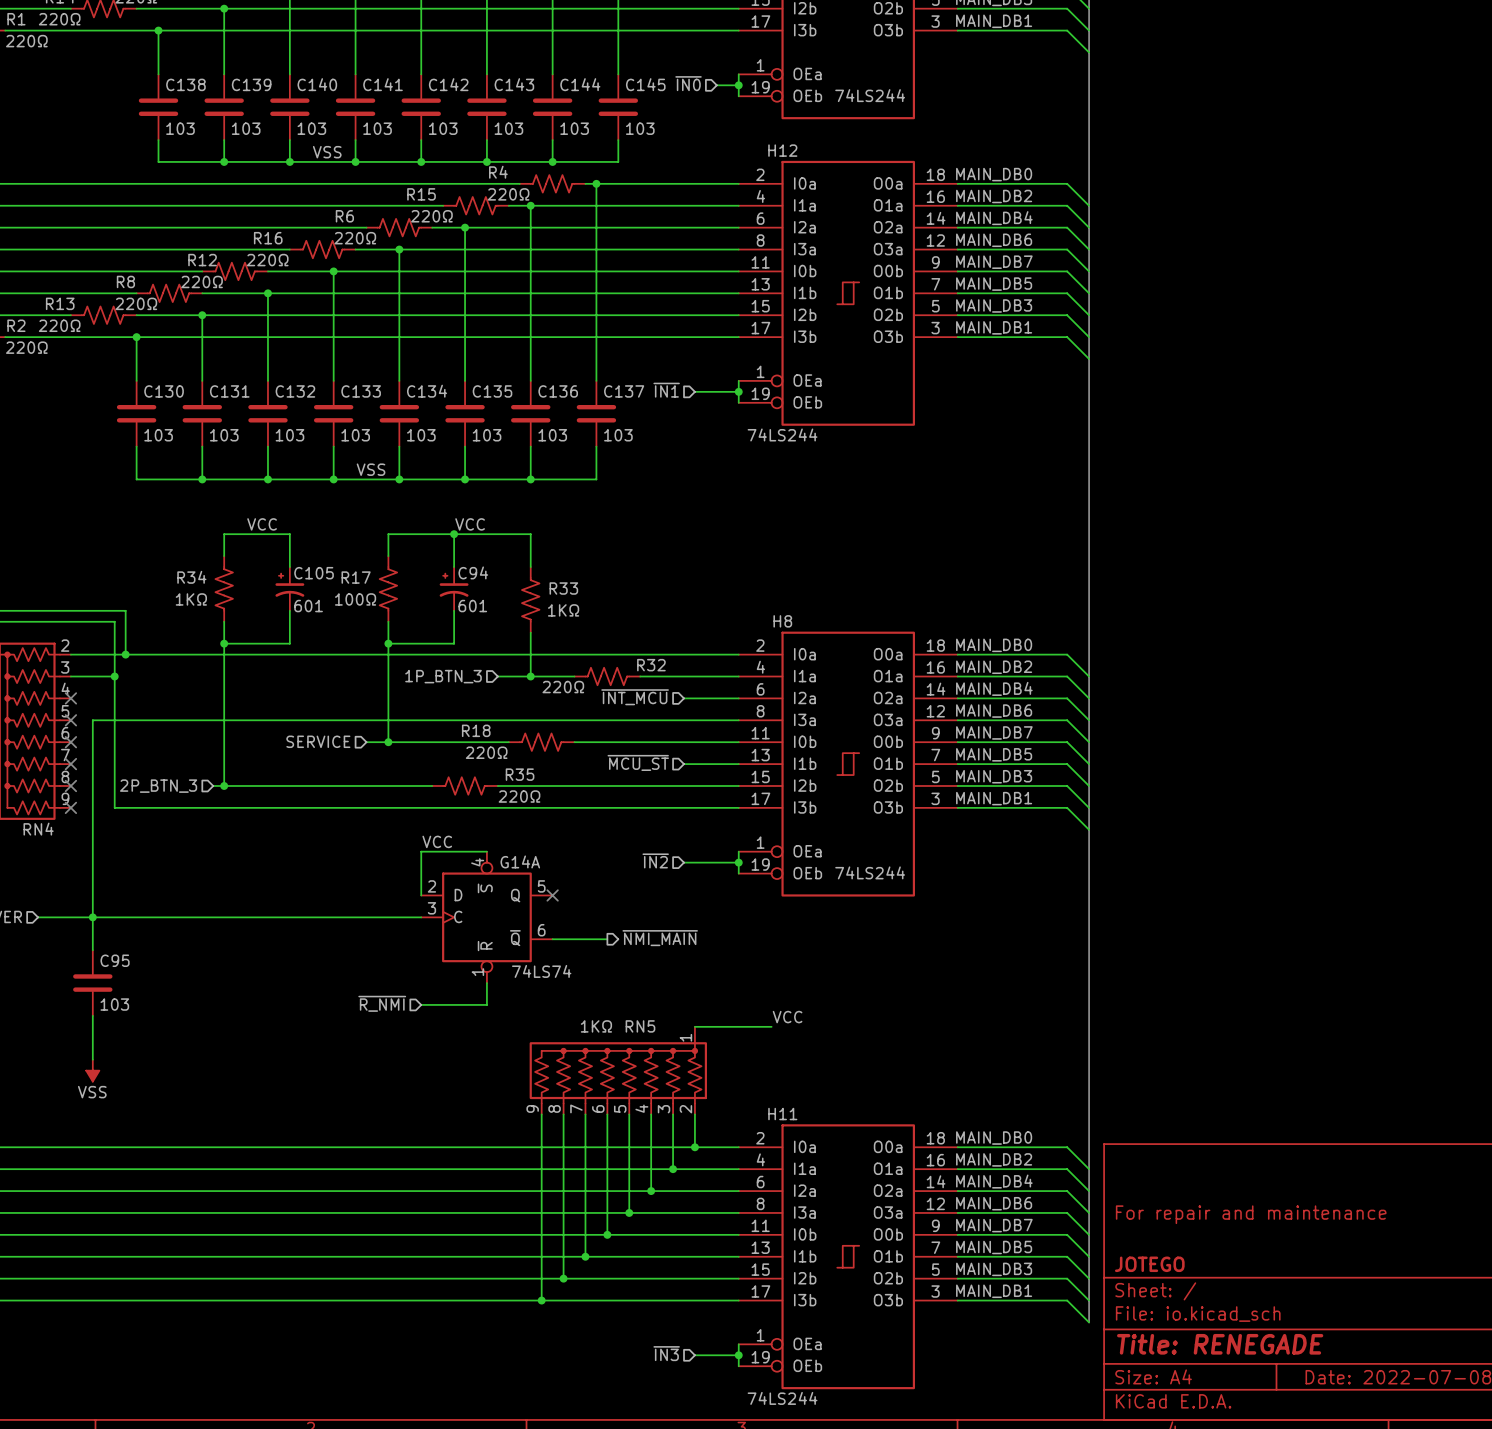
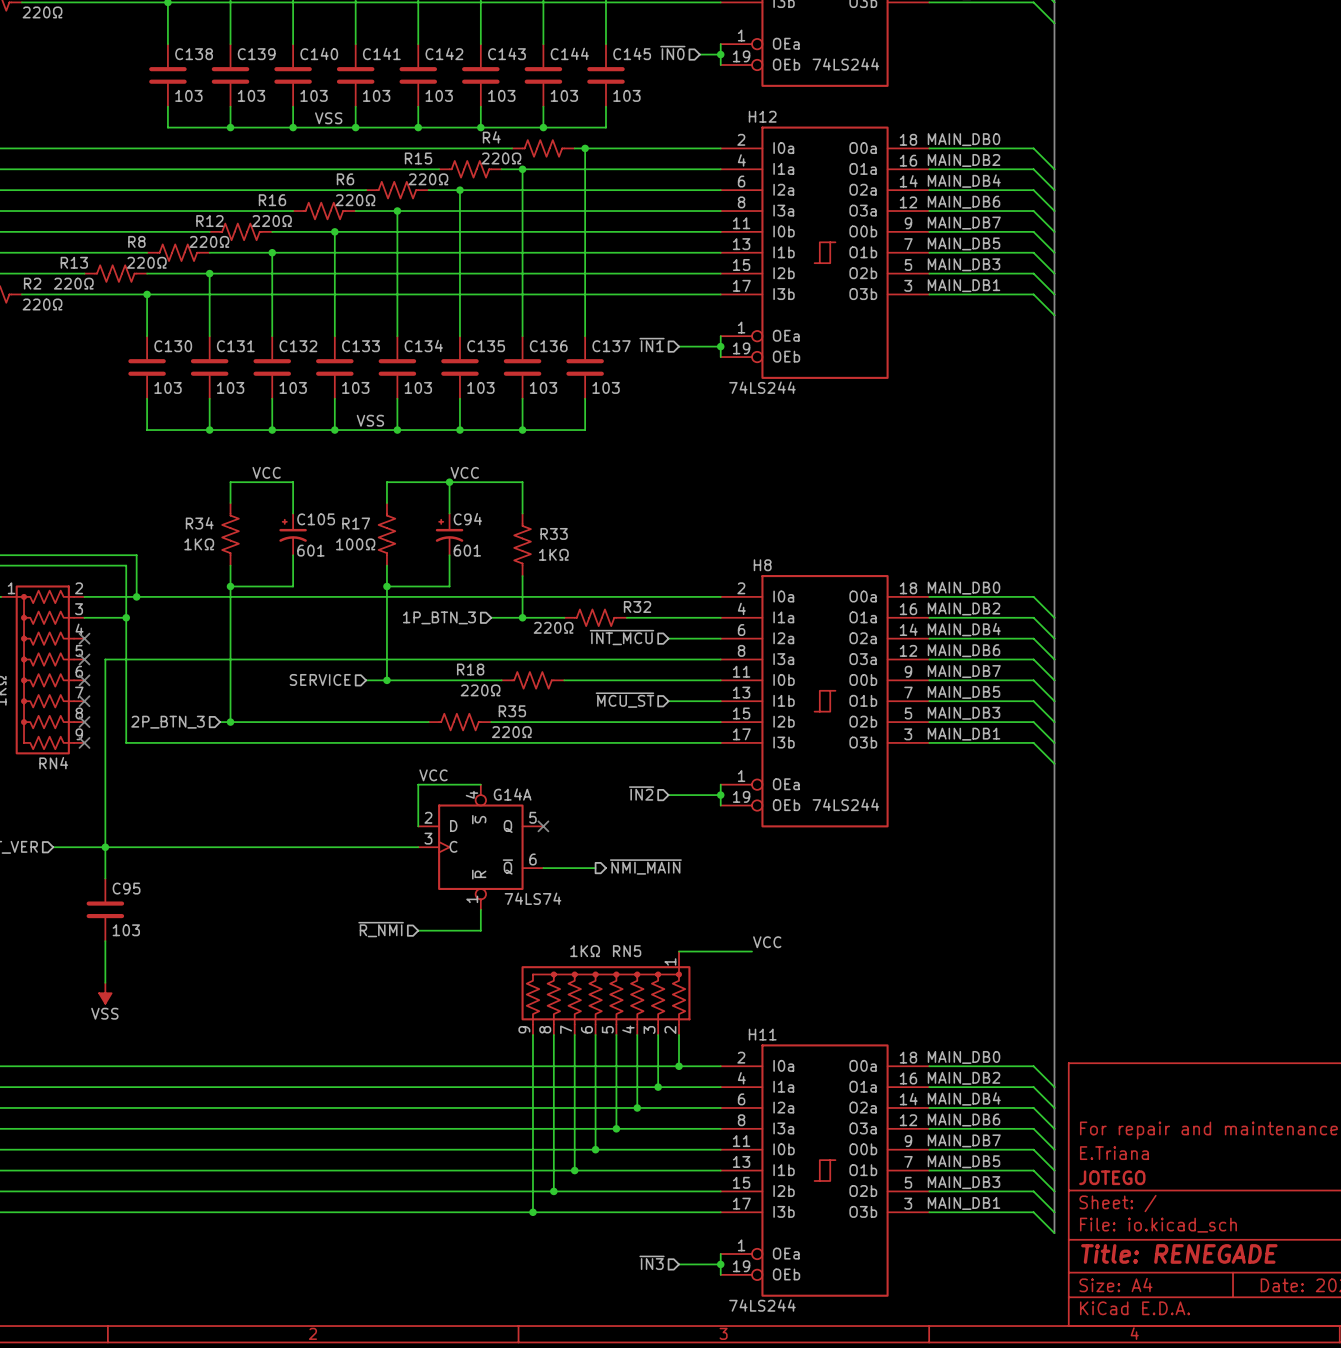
title block: none -> E.Triana (1114, 1153)

